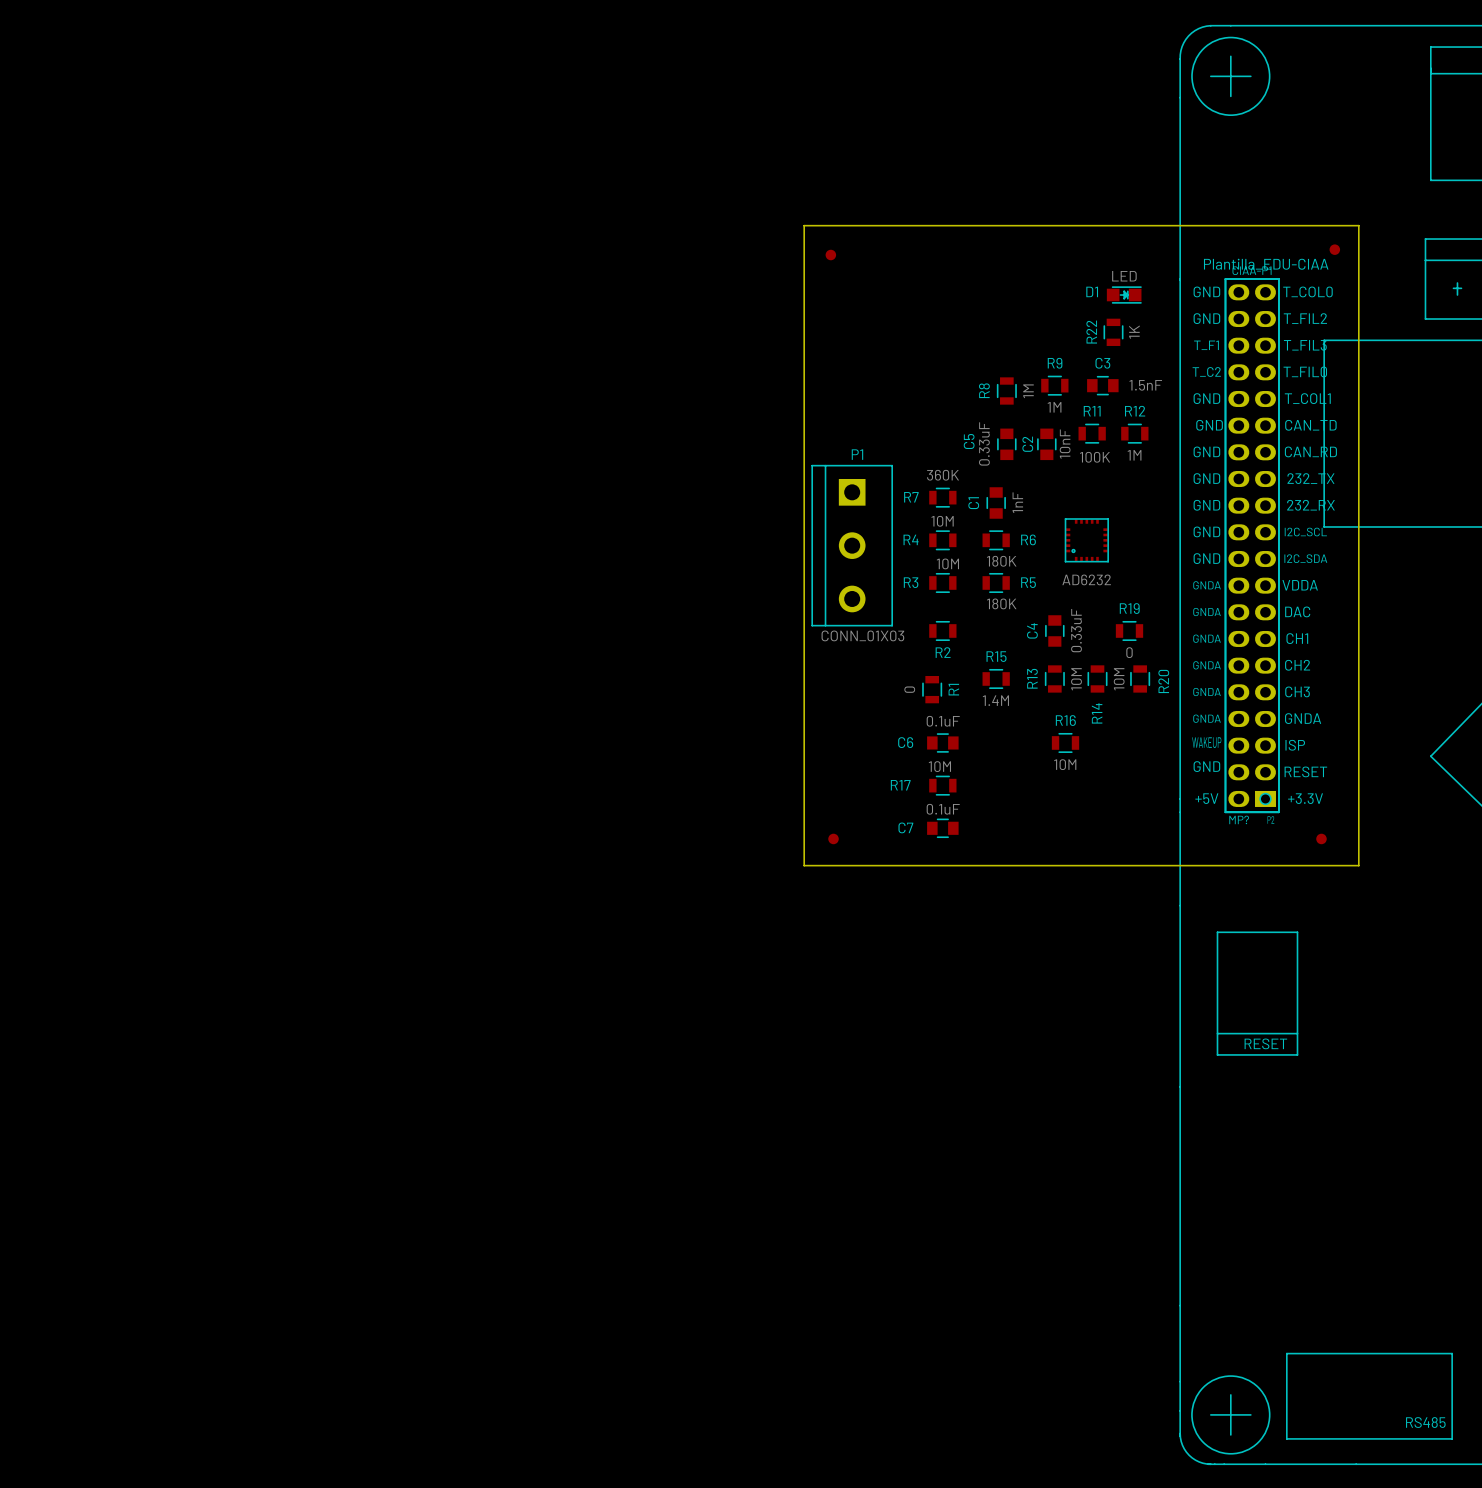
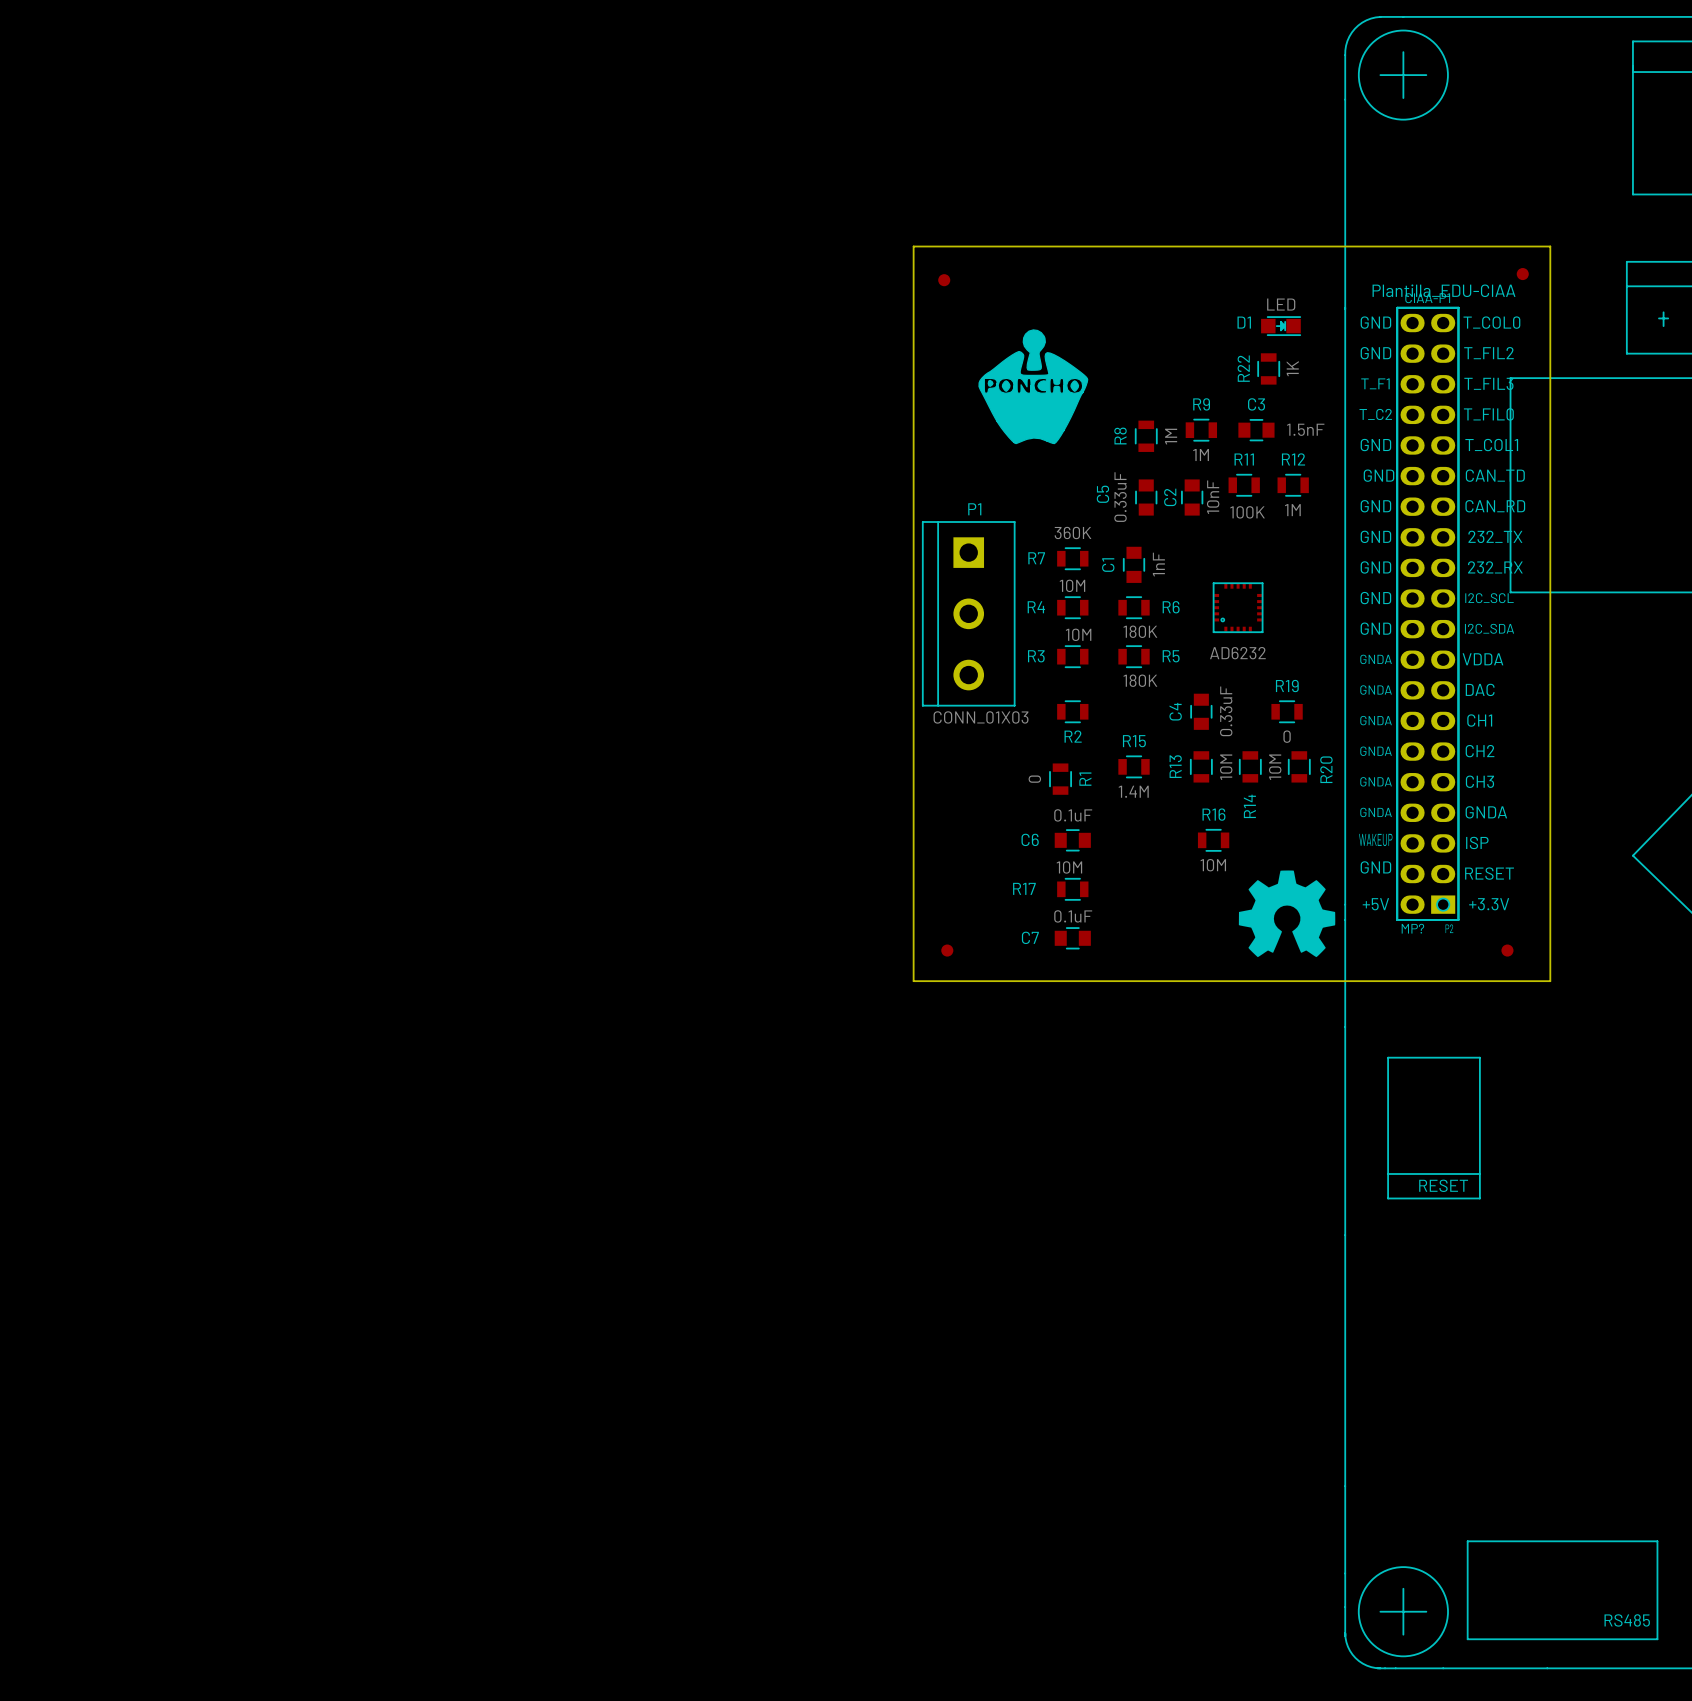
drawing: none -> [978, 329, 1089, 445]
drawing: none -> [1238, 870, 1336, 958]

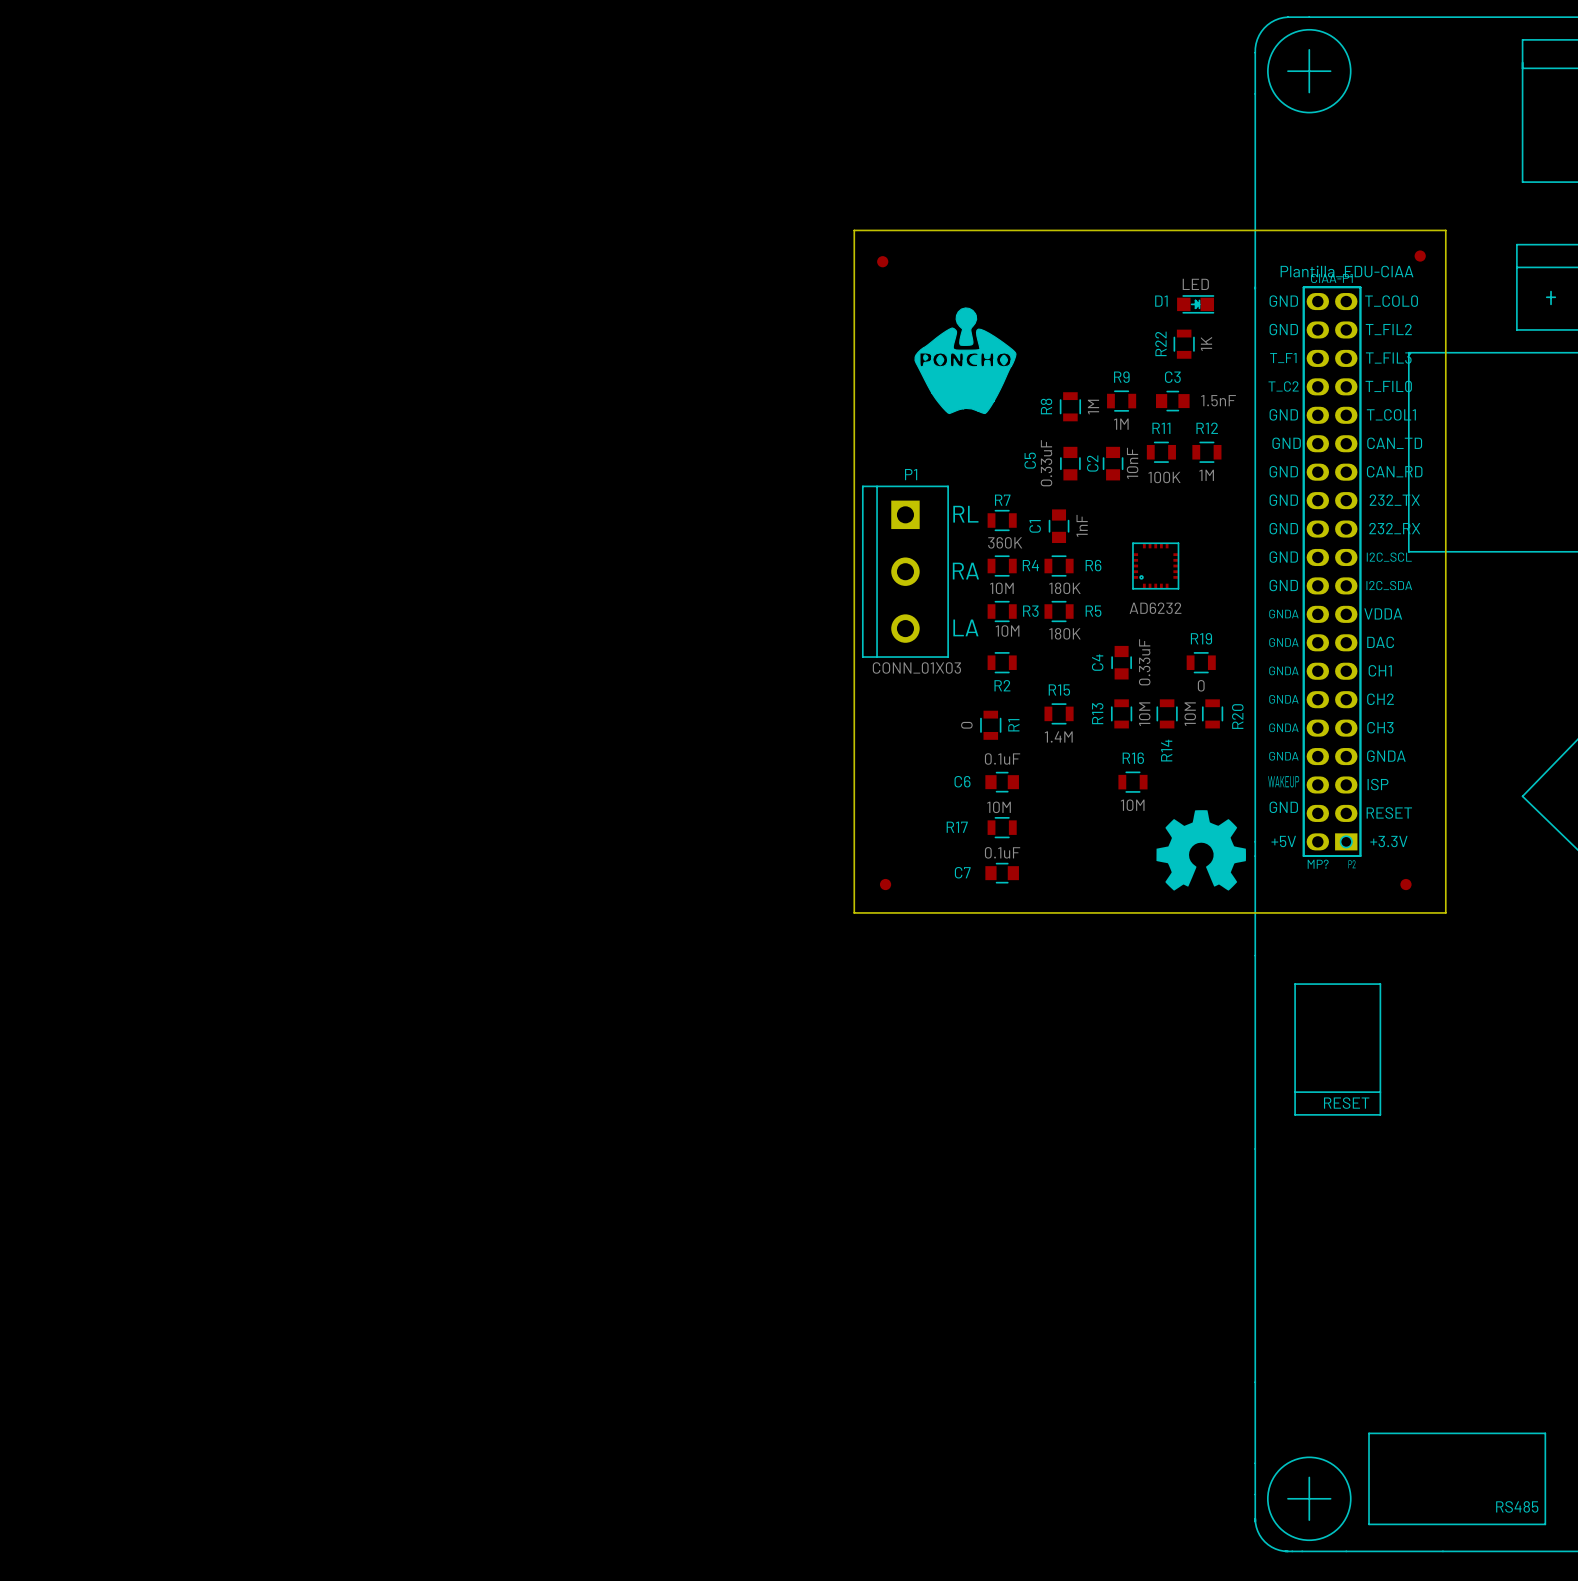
R7 value position: 360K (1072, 532) -> 360K (1005, 542)
text: none -> RL (965, 514)
R7 name position: R7 (1036, 558) -> R7 (1002, 500)
R4 value position: 10M (1072, 585) -> 10M (1001, 588)
R4 name position: R4 (1036, 607) -> R4 (1030, 565)
text: none -> RA (965, 571)
R3 value position: 10M (1078, 634) -> 10M (1007, 631)
R3 name position: R3 (1036, 656) -> R3 (1030, 611)
text: none -> LA (965, 627)

